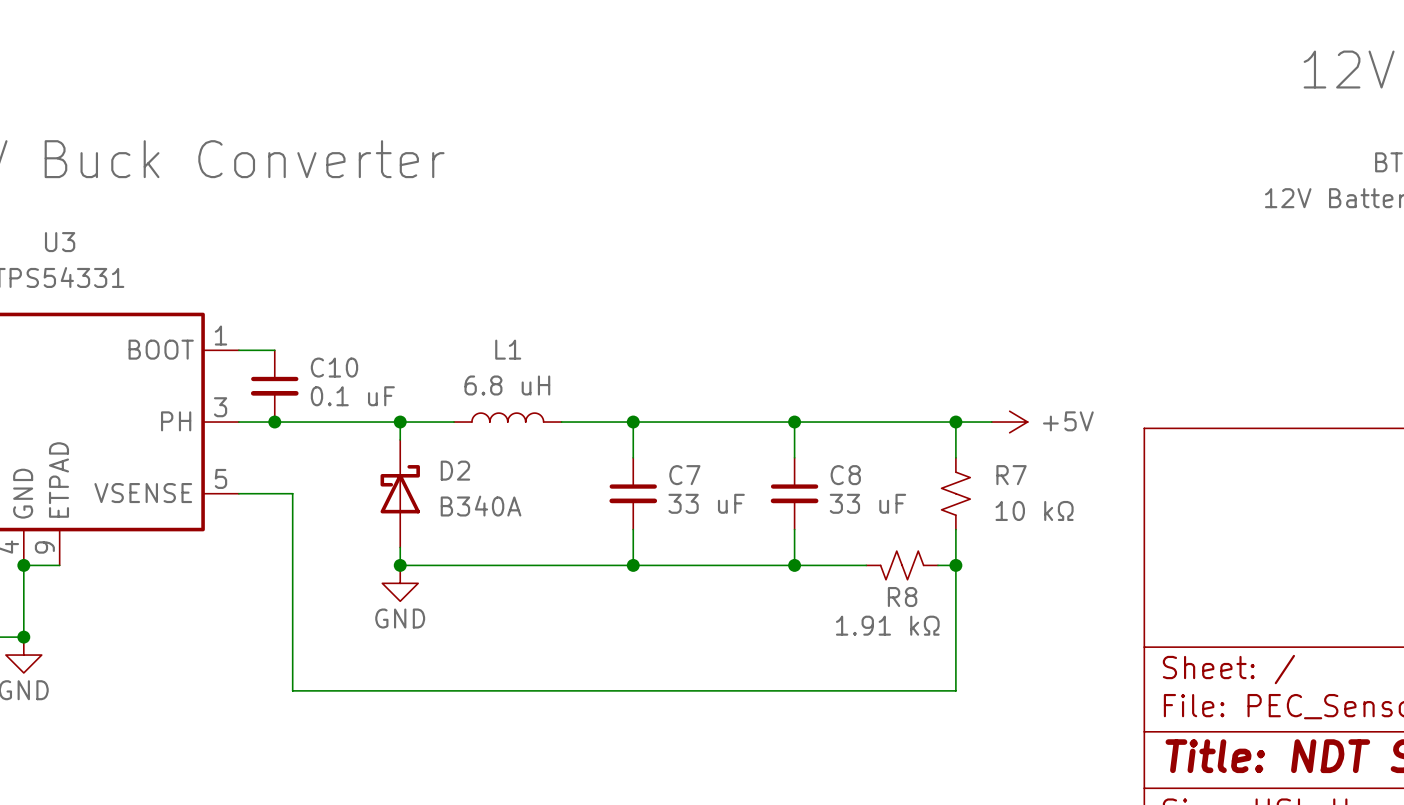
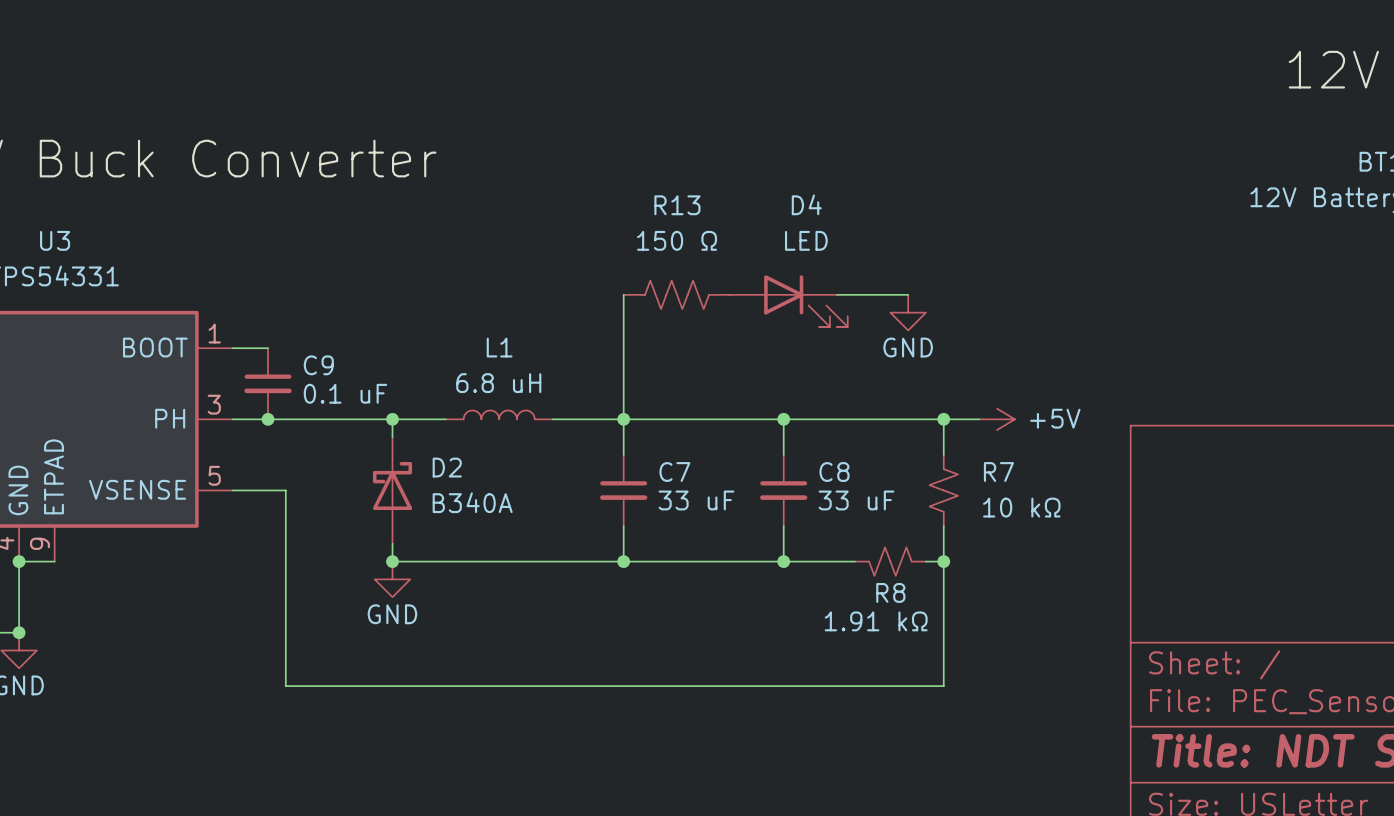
wire: none -> (623, 294) (623, 419)
R13: none -> 150 Ω (677, 294)
wire: none -> (837, 294) (908, 294)
D4: none -> LED (789, 301)
power symbol: none -> GND (908, 312)
C10 name: C10 (334, 367) -> C9 (318, 365)

